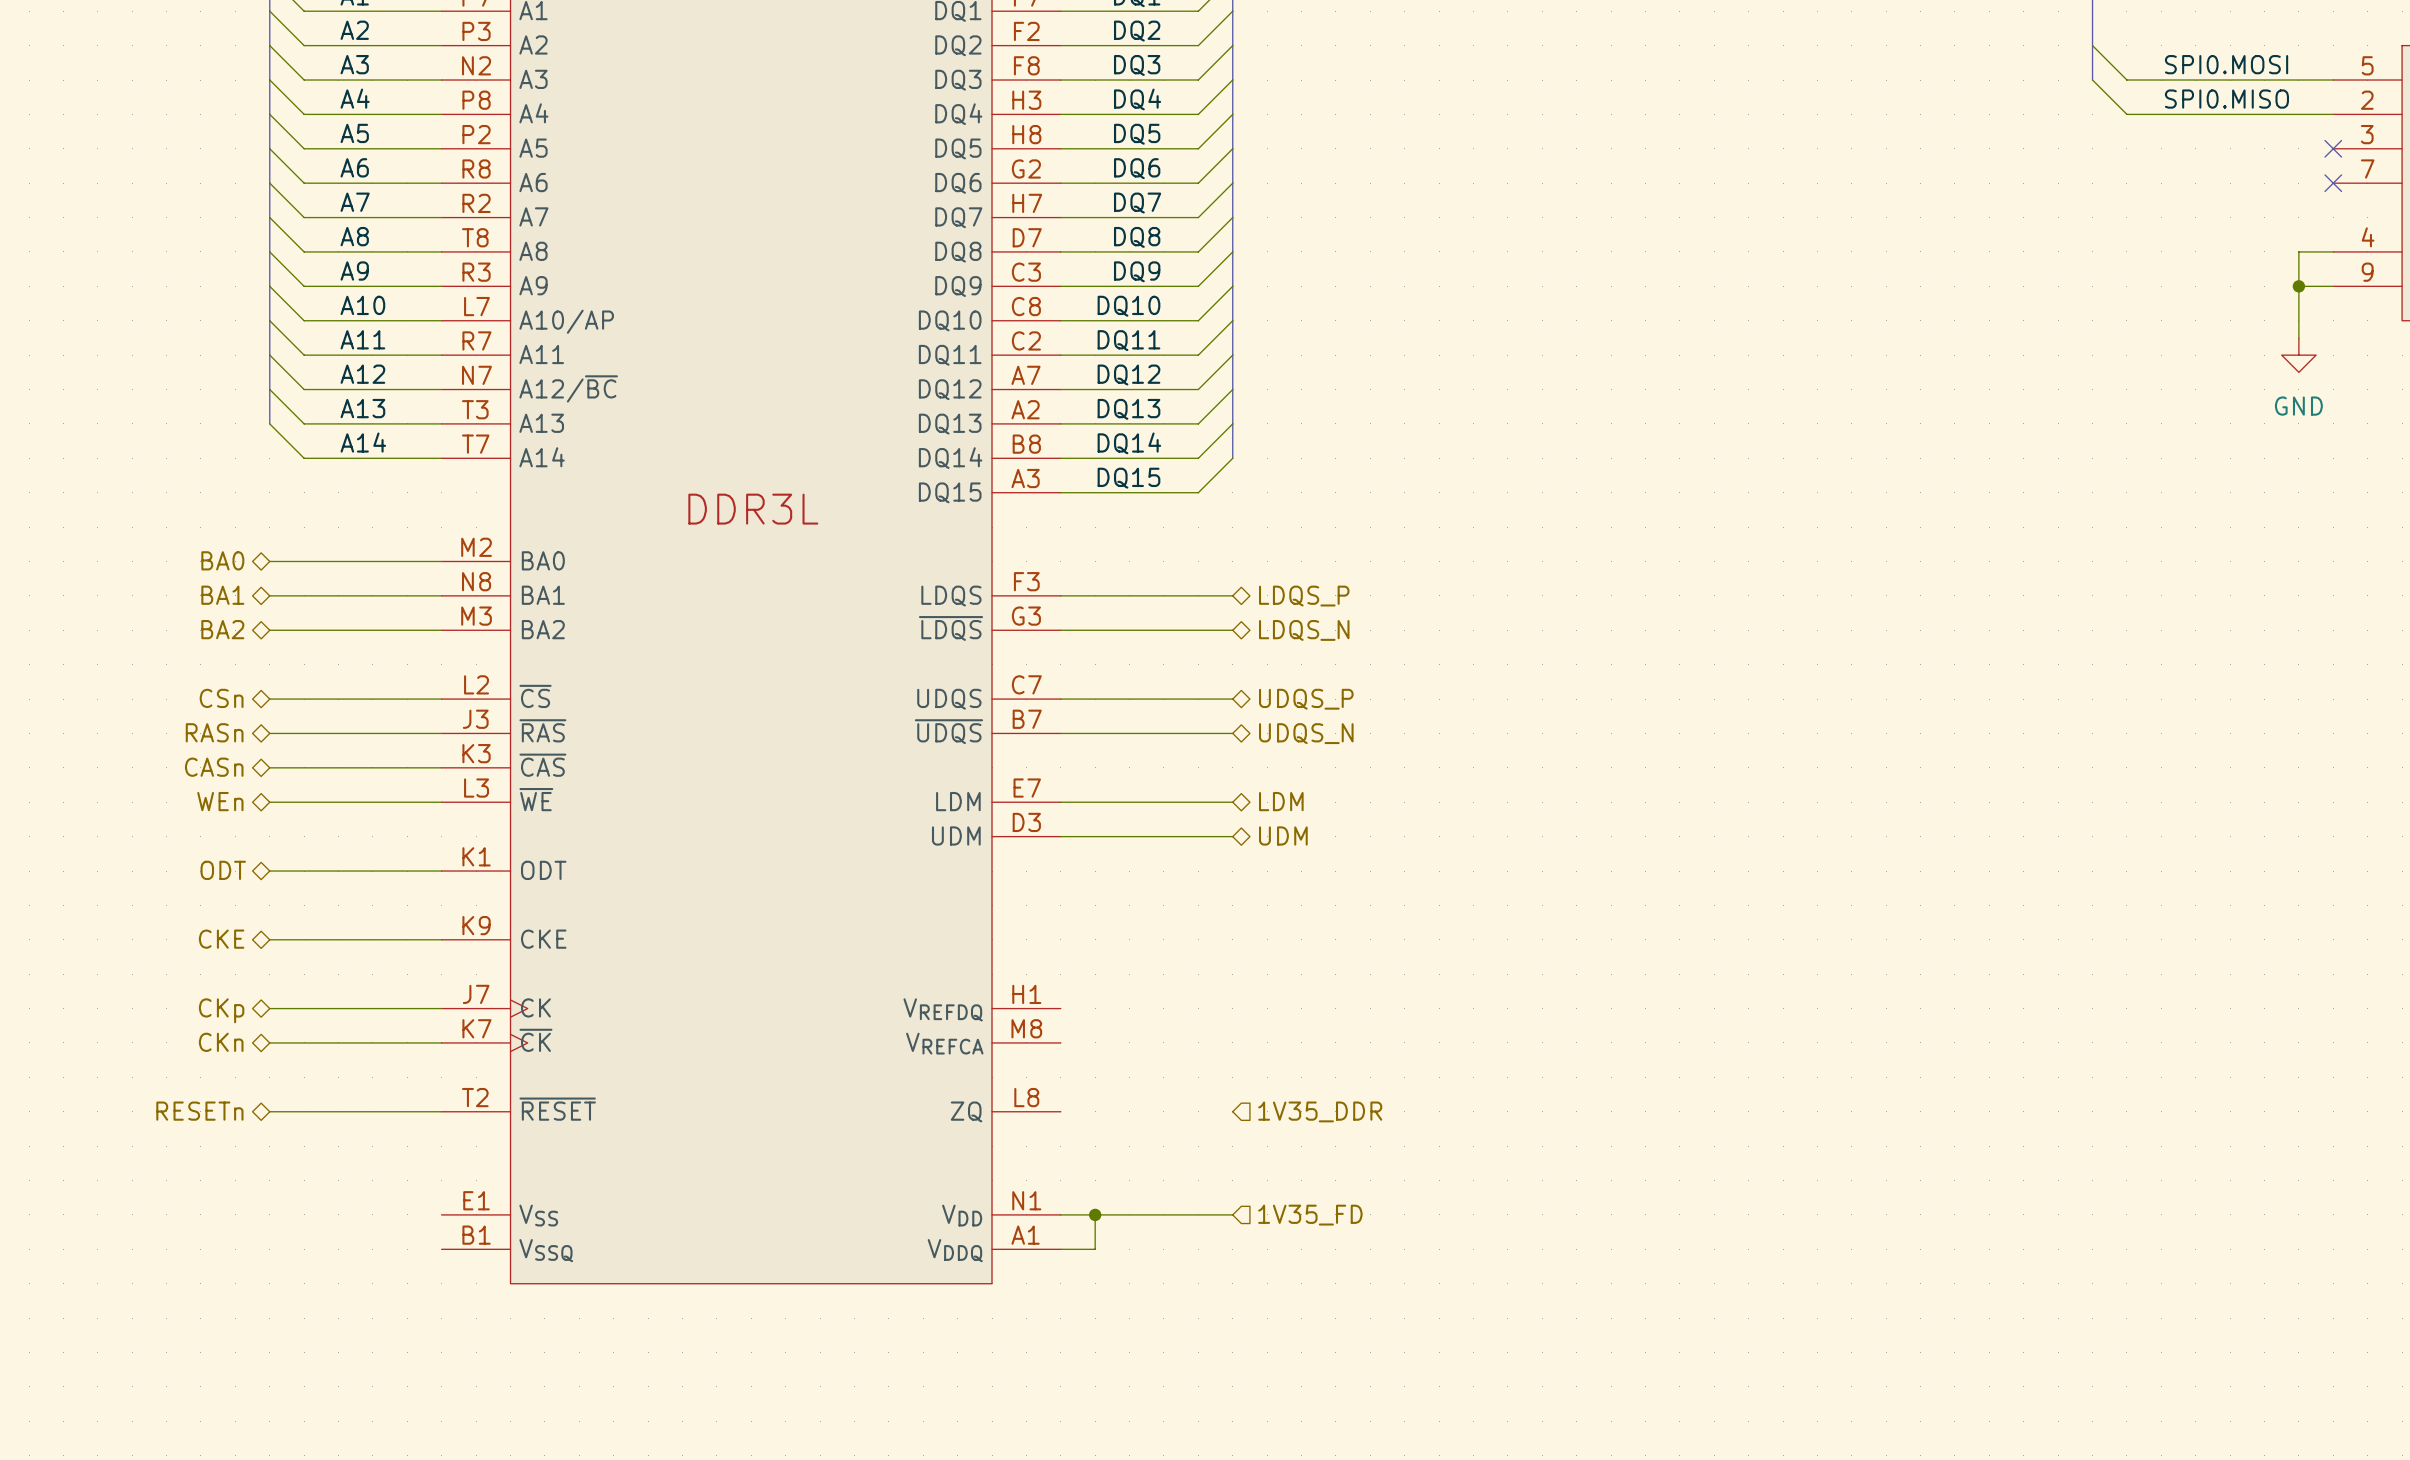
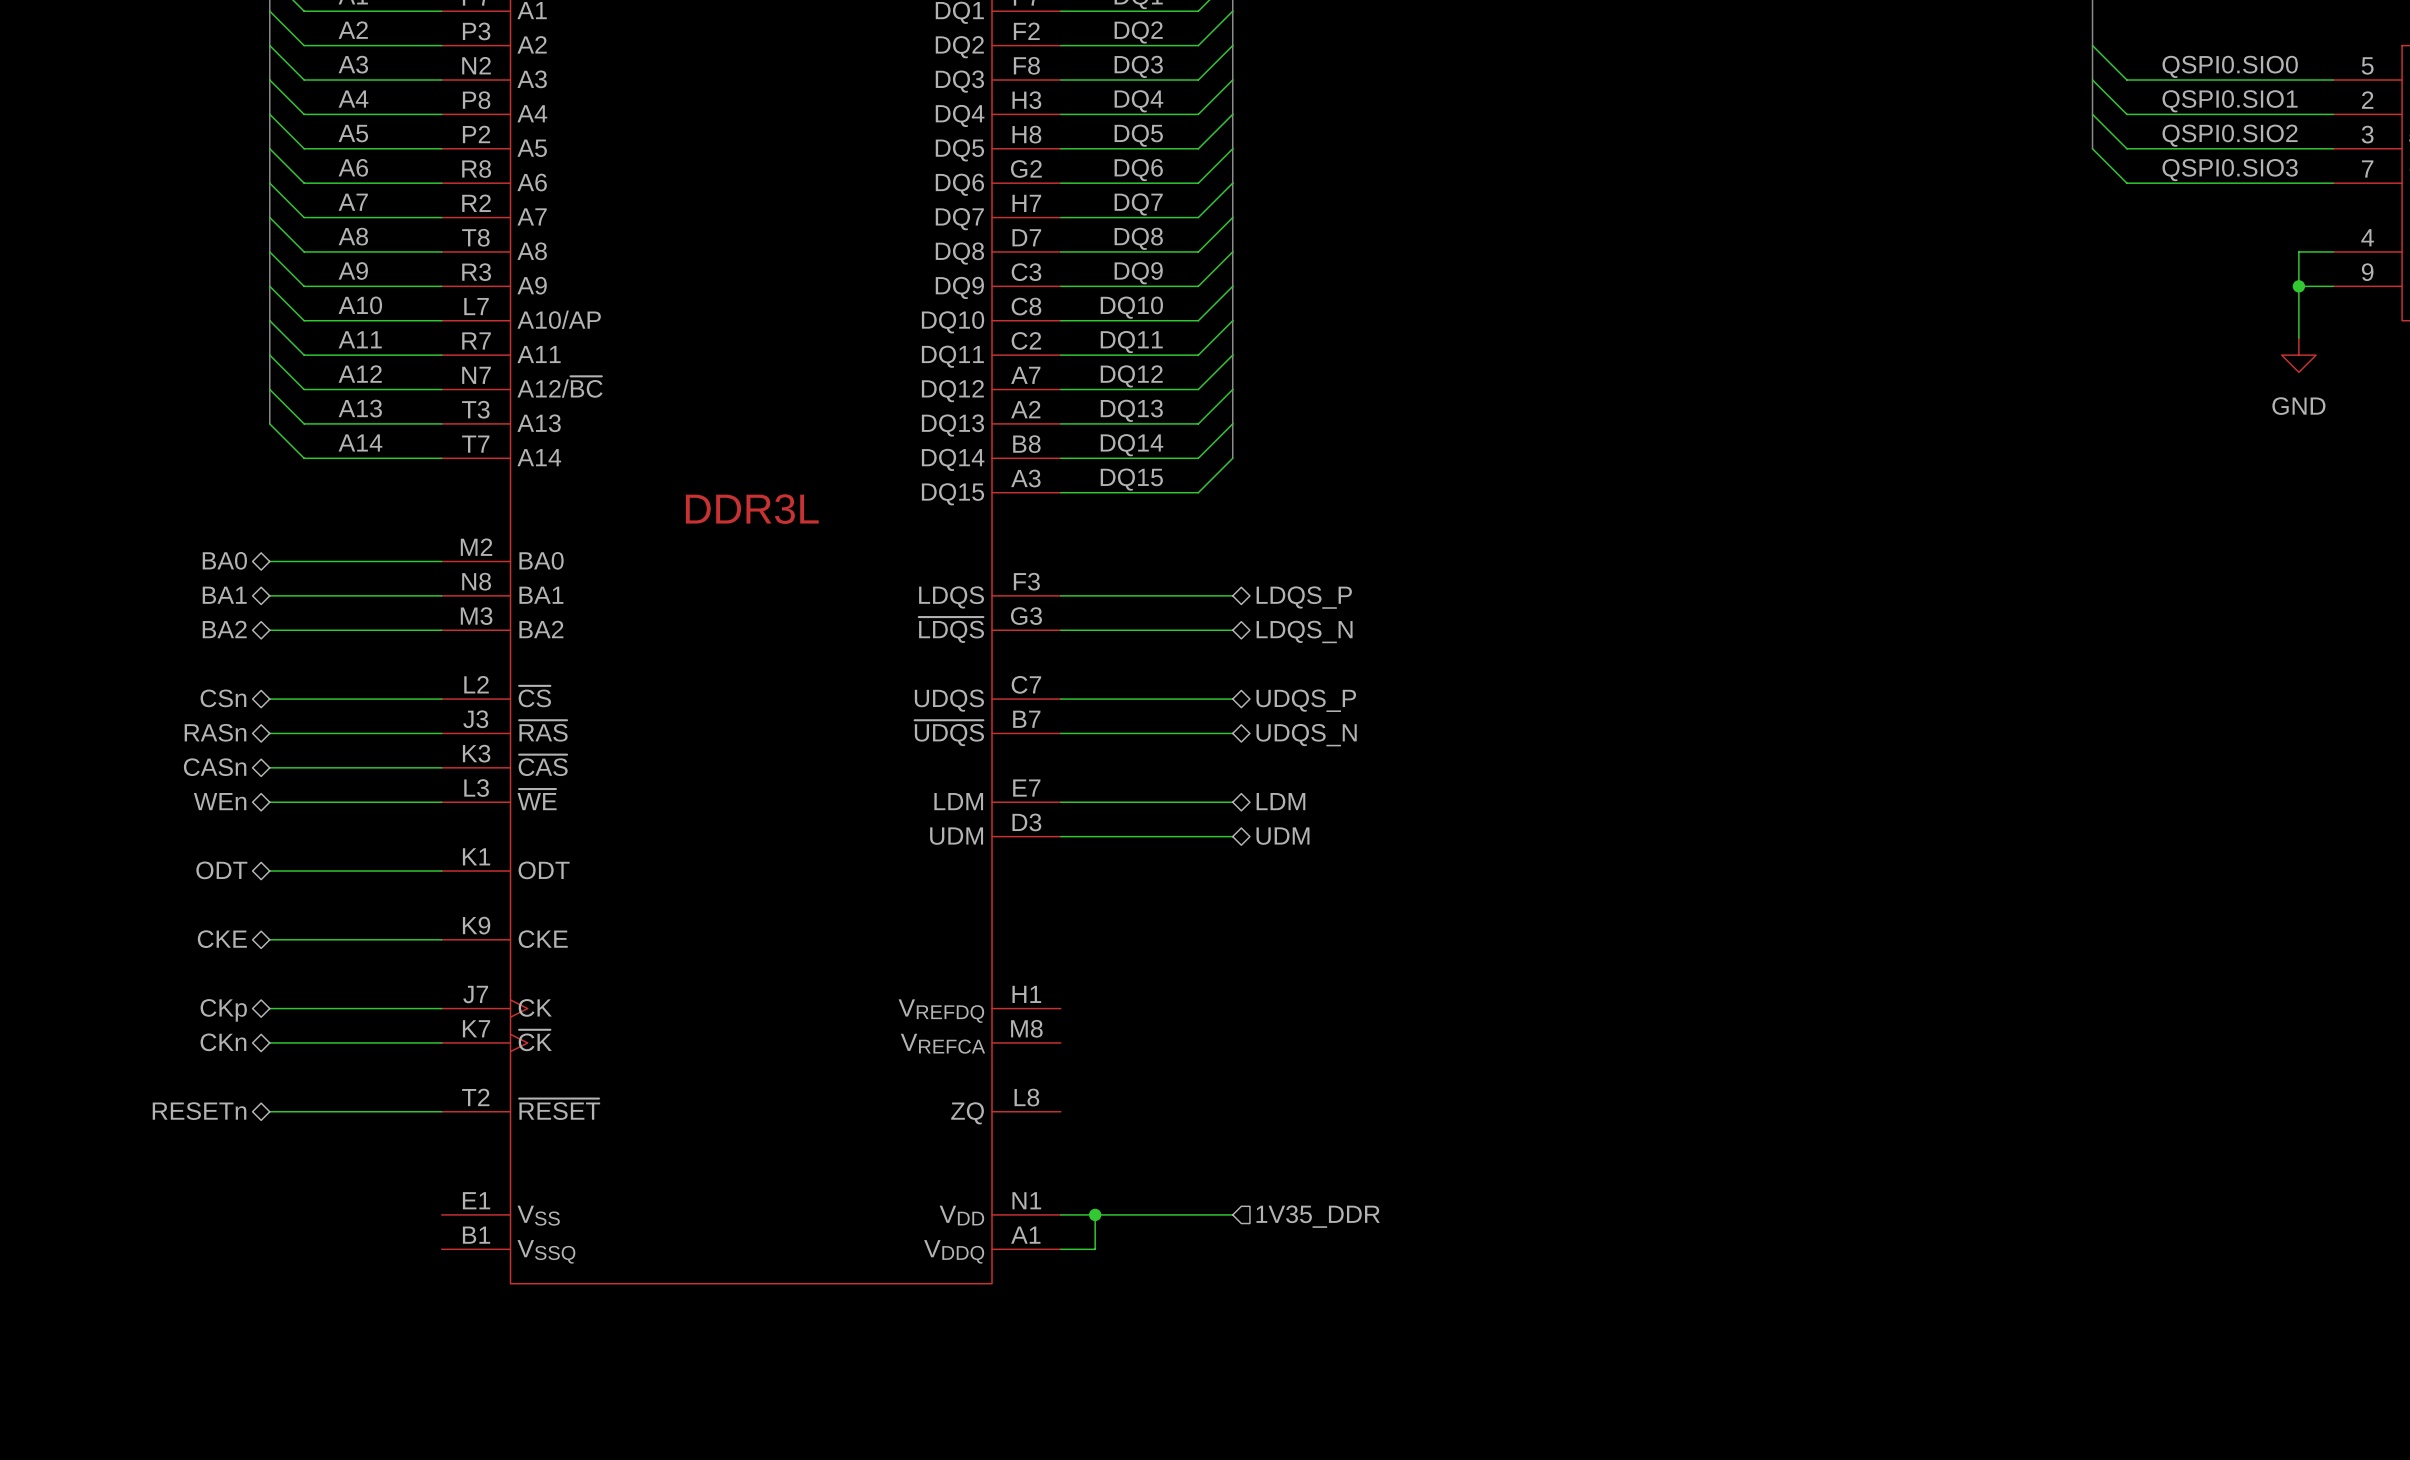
label: SPI0.MOSI (2226, 64) -> QSPI0.SIO0 (2230, 66)
bus: none -> (2092, 80) (2092, 148)
label: SPI0.MISO (2226, 99) -> QSPI0.SIO1 (2230, 101)
wire: none -> (2092, 114) (2126, 148) (2333, 148)
label: none -> QSPI0.SIO2 (2230, 135)
wire: none -> (2092, 148) (2126, 183) (2333, 183)
no-connect mark: (2333, 148) -> none
label: none -> QSPI0.SIO3 (2230, 170)
no-connect mark: (2333, 183) -> none
hierarchical label: 1V35_DDR (1320, 1111) -> none
hierarchical label: 1V35_FD (1310, 1215) -> 1V35_DDR (1318, 1216)

